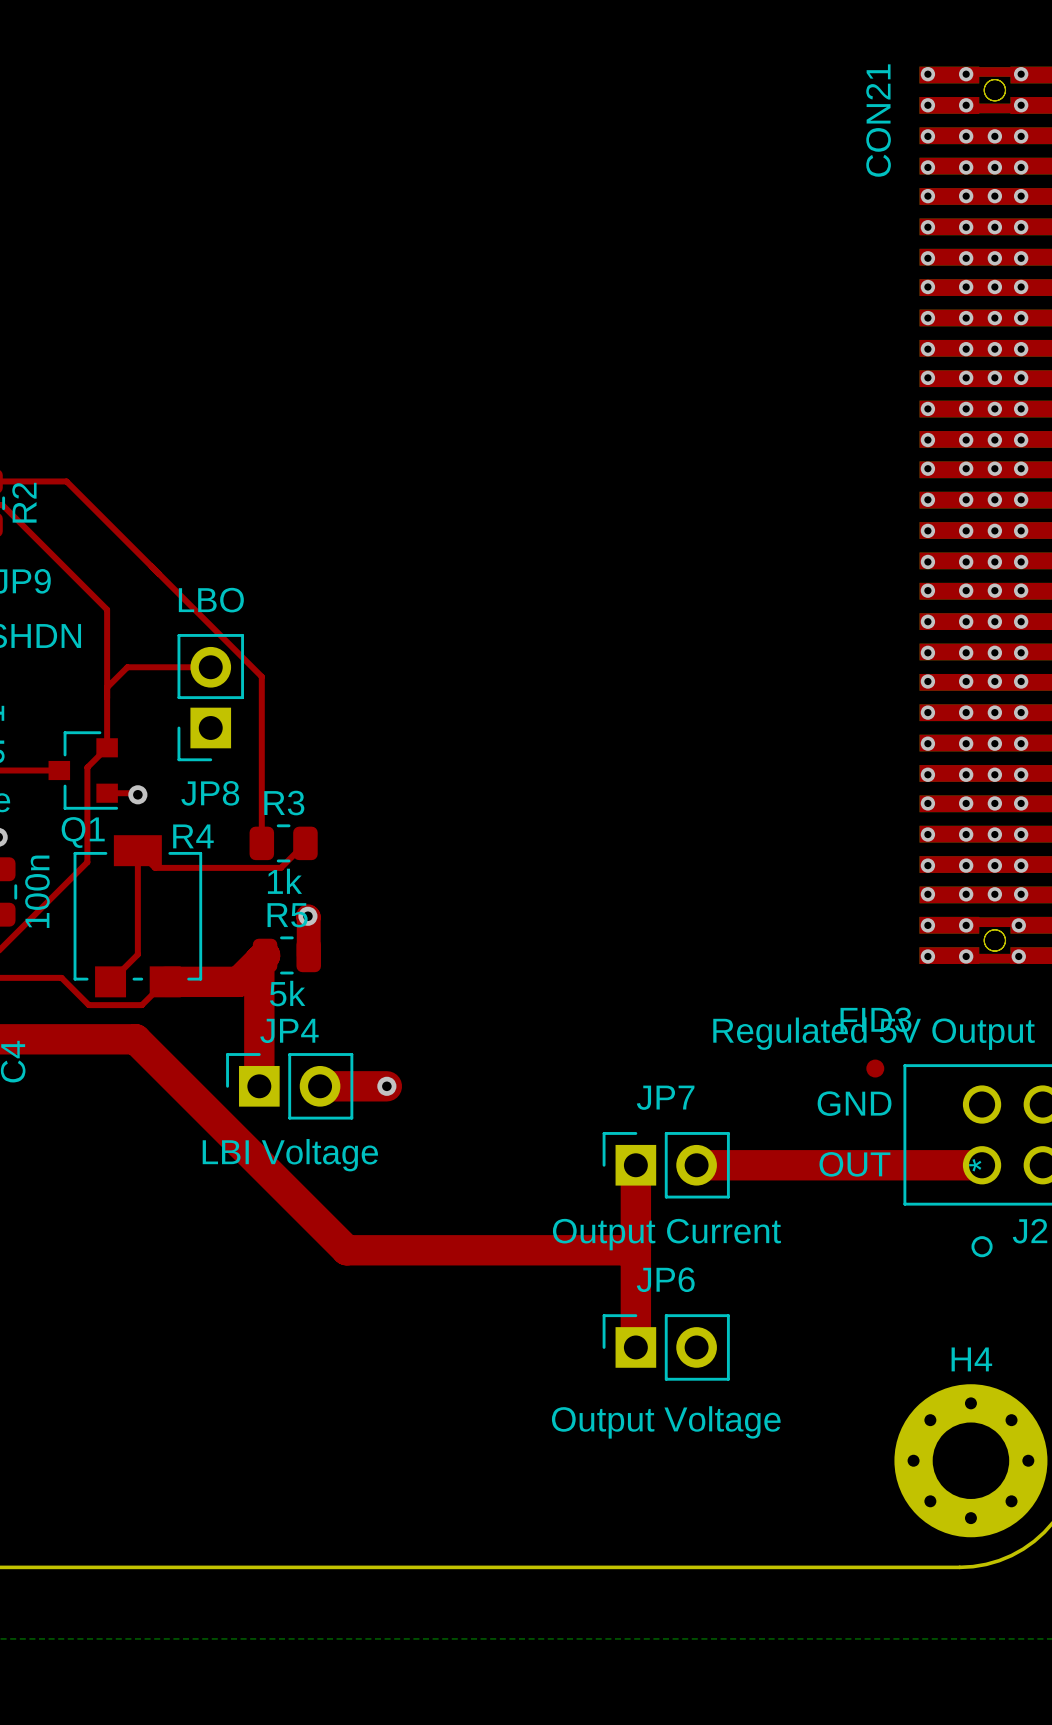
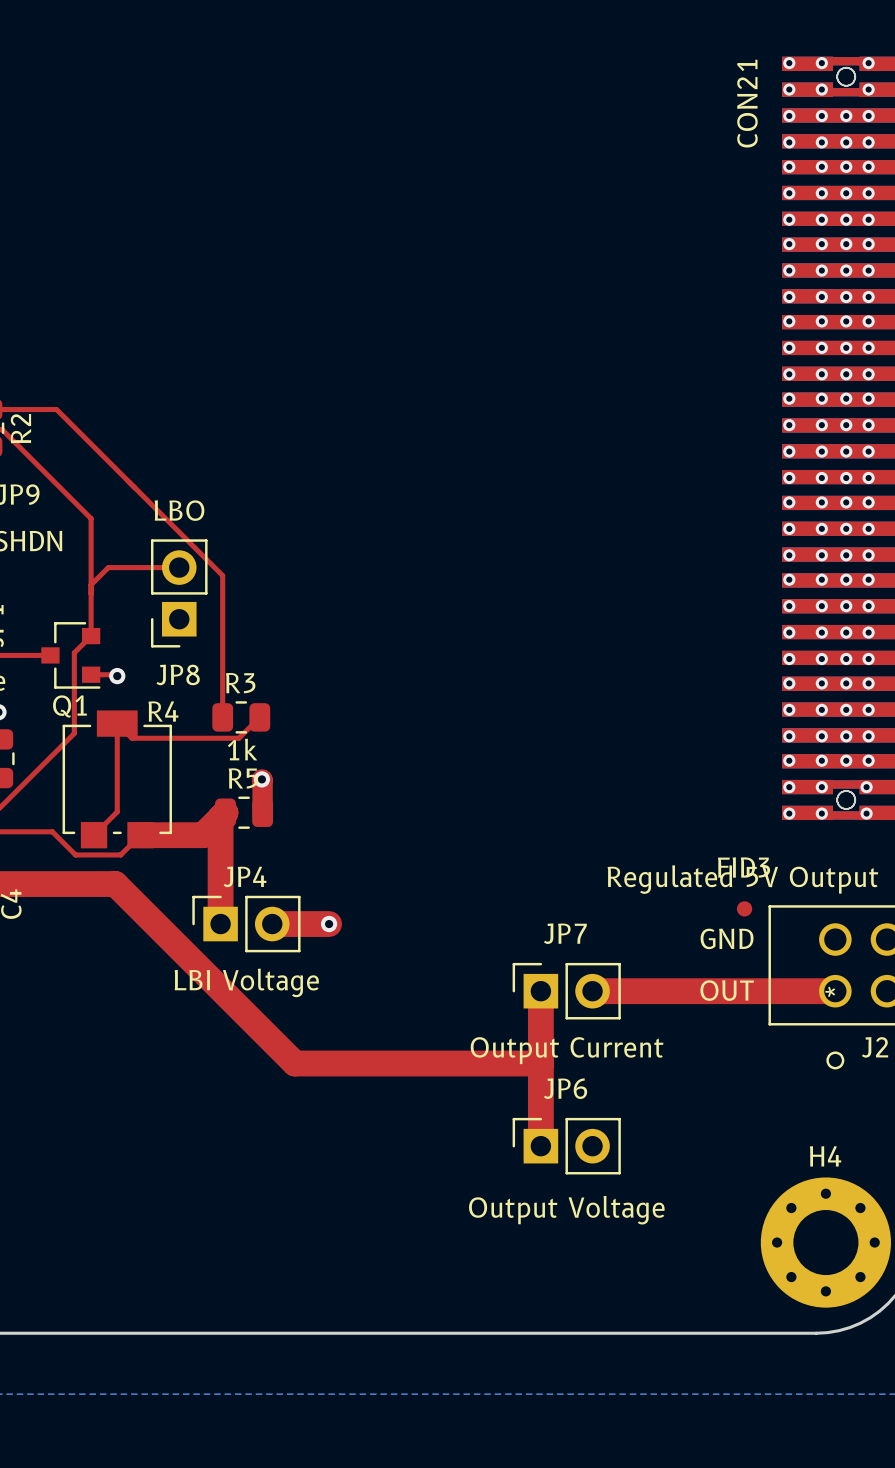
part value: 100n (37, 891) -> none
R5 value: 5k (287, 993) -> none

